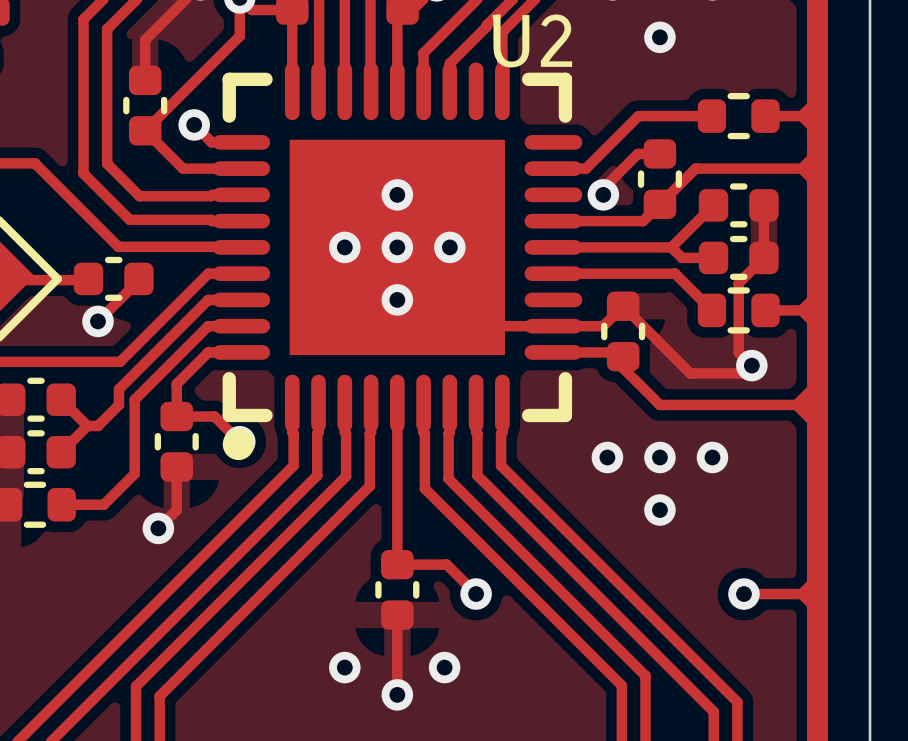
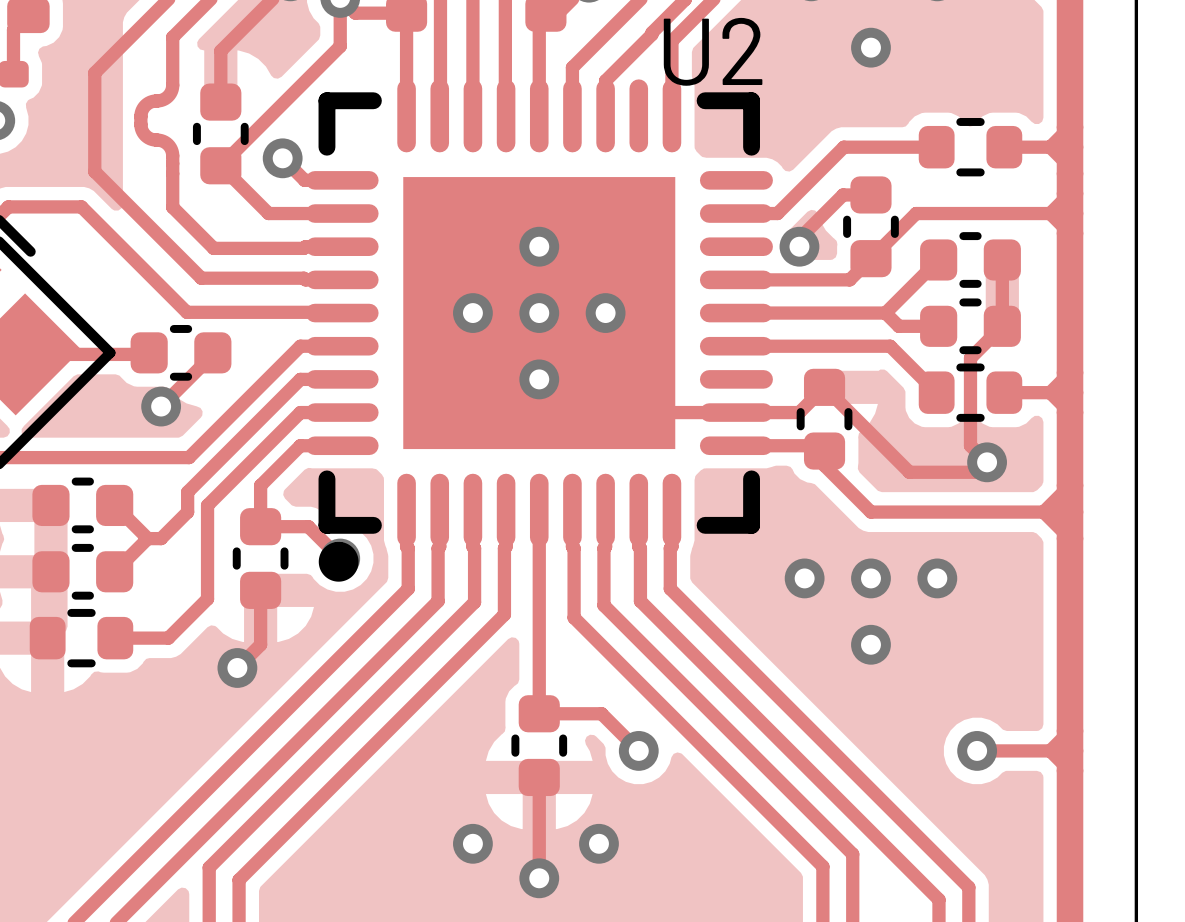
track: (83, 19) (83, 173) -> (142, 24) (94, 73) (94, 171) (142, 219)
track: (107, 67) (107, 122) -> (172, 85) (168, 96) (157, 100)
track: none -> (156, 100) (145, 105) (140, 116) (142, 132) (148, 138) (156, 140)
track: none -> (157, 140) (168, 144) (172, 155)

